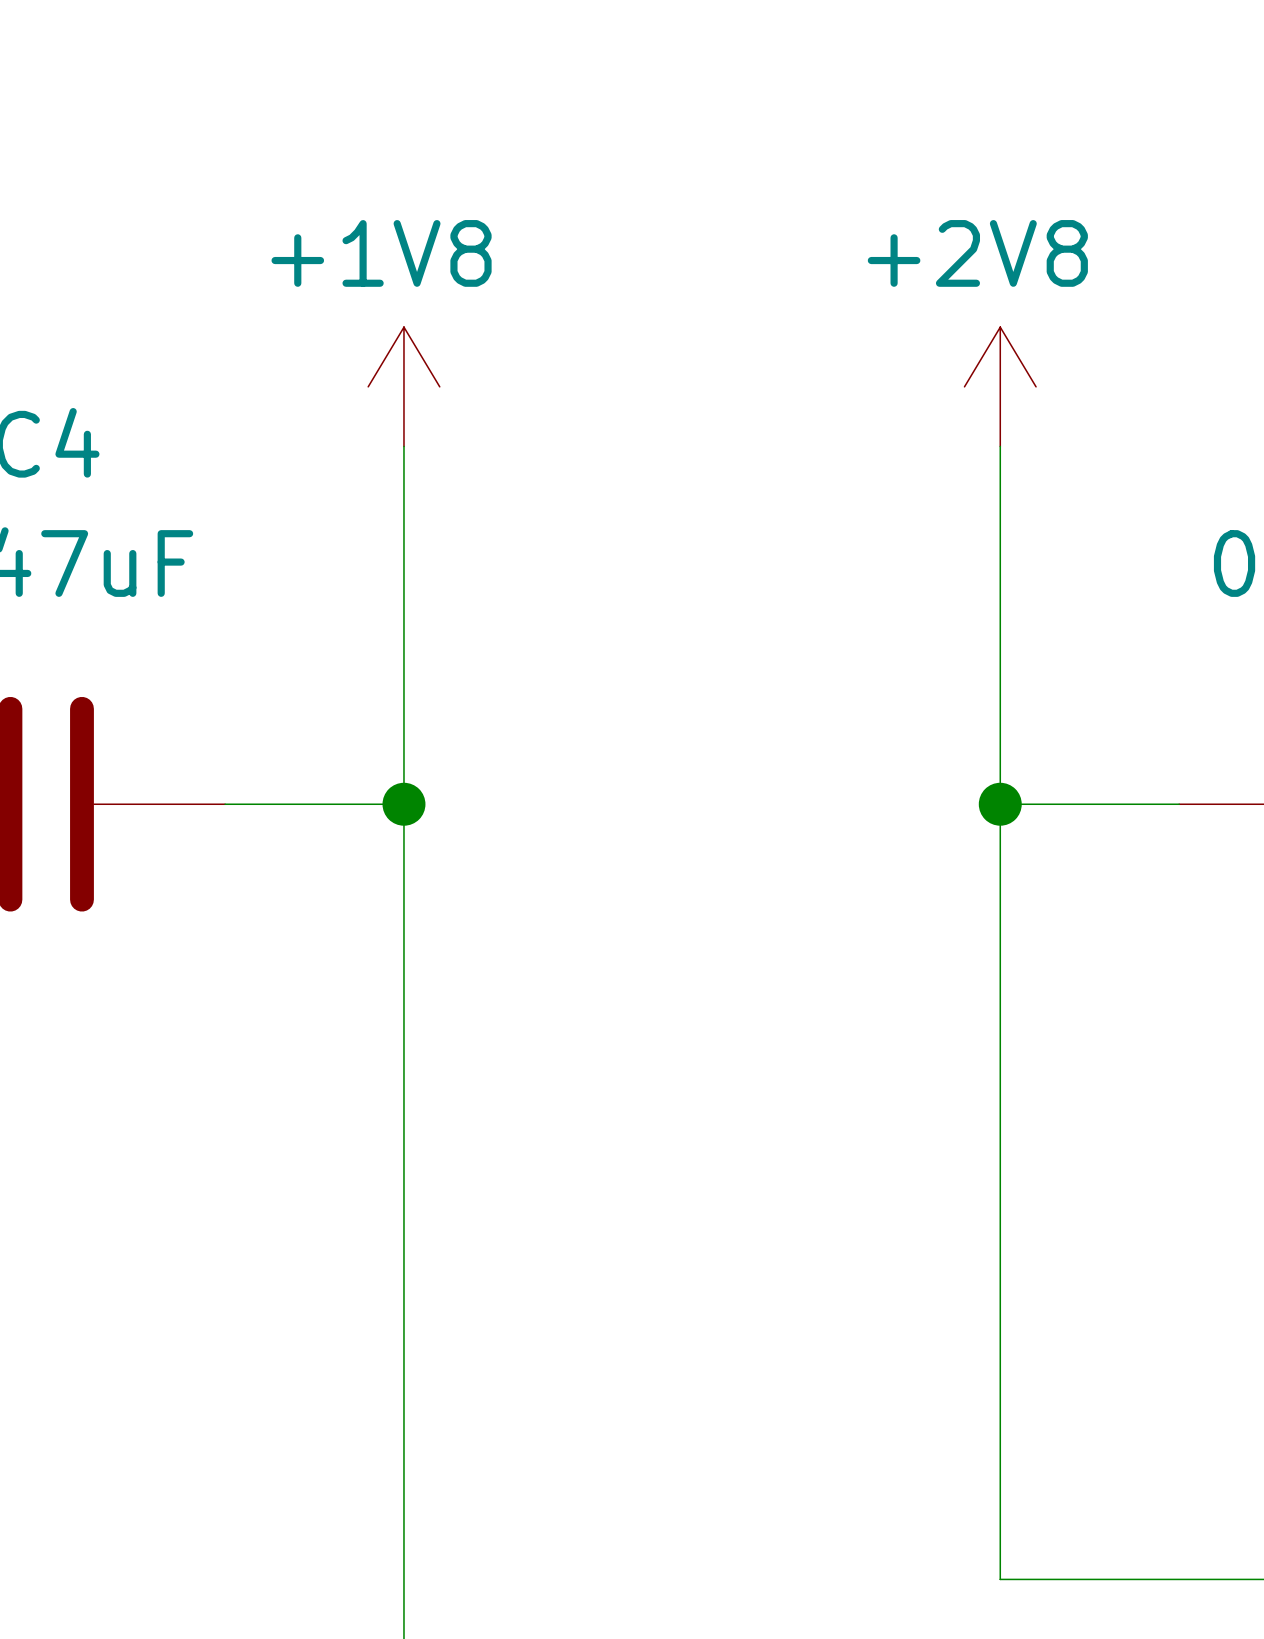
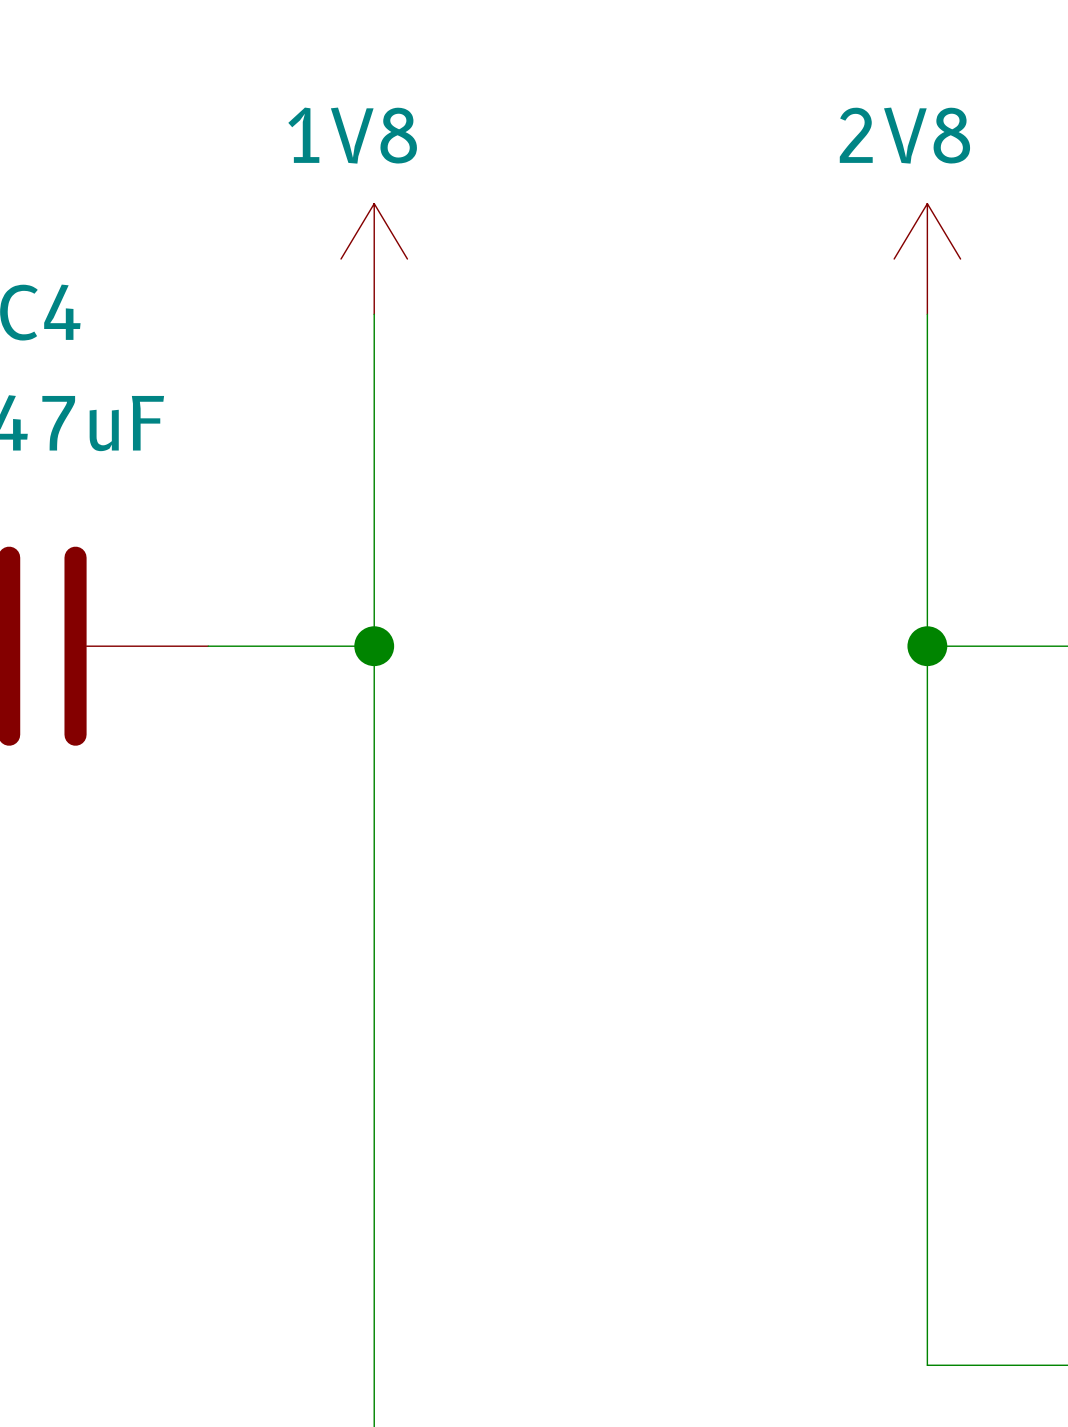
power symbol: +1V8 (403, 386) -> 1V8 (374, 259)
power symbol: +2V8 (1000, 386) -> 2V8 (927, 259)

